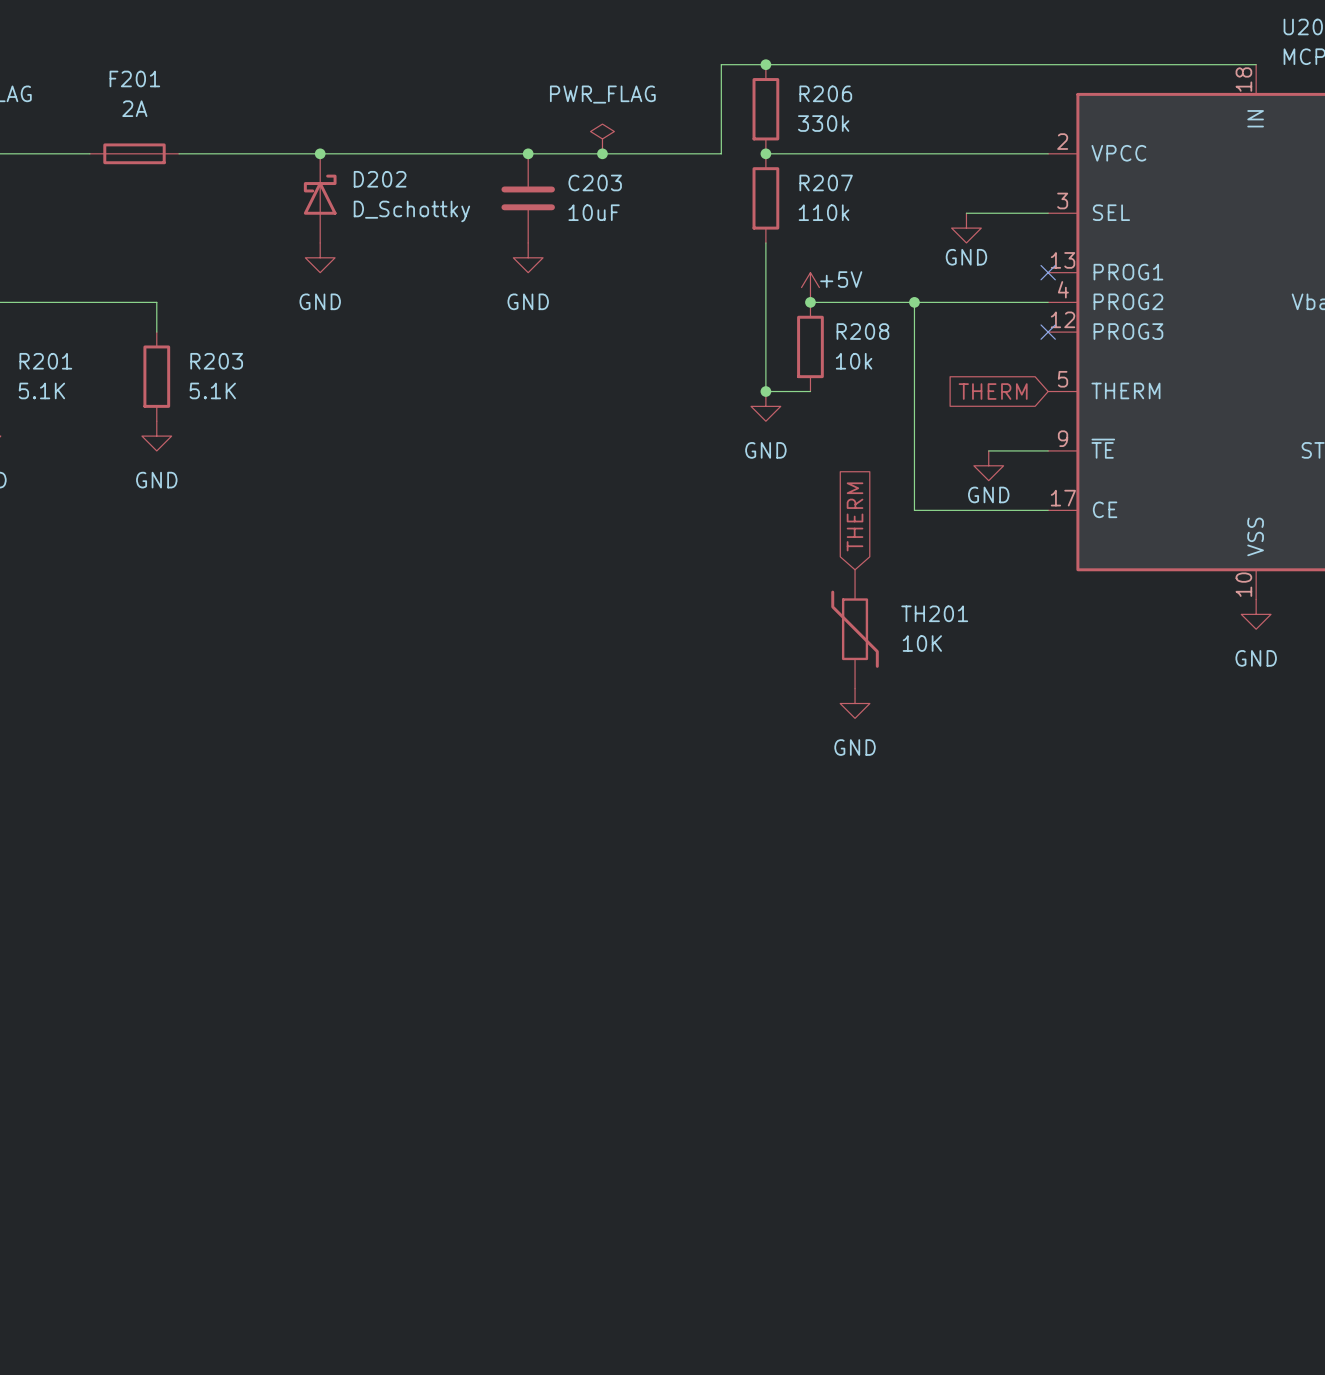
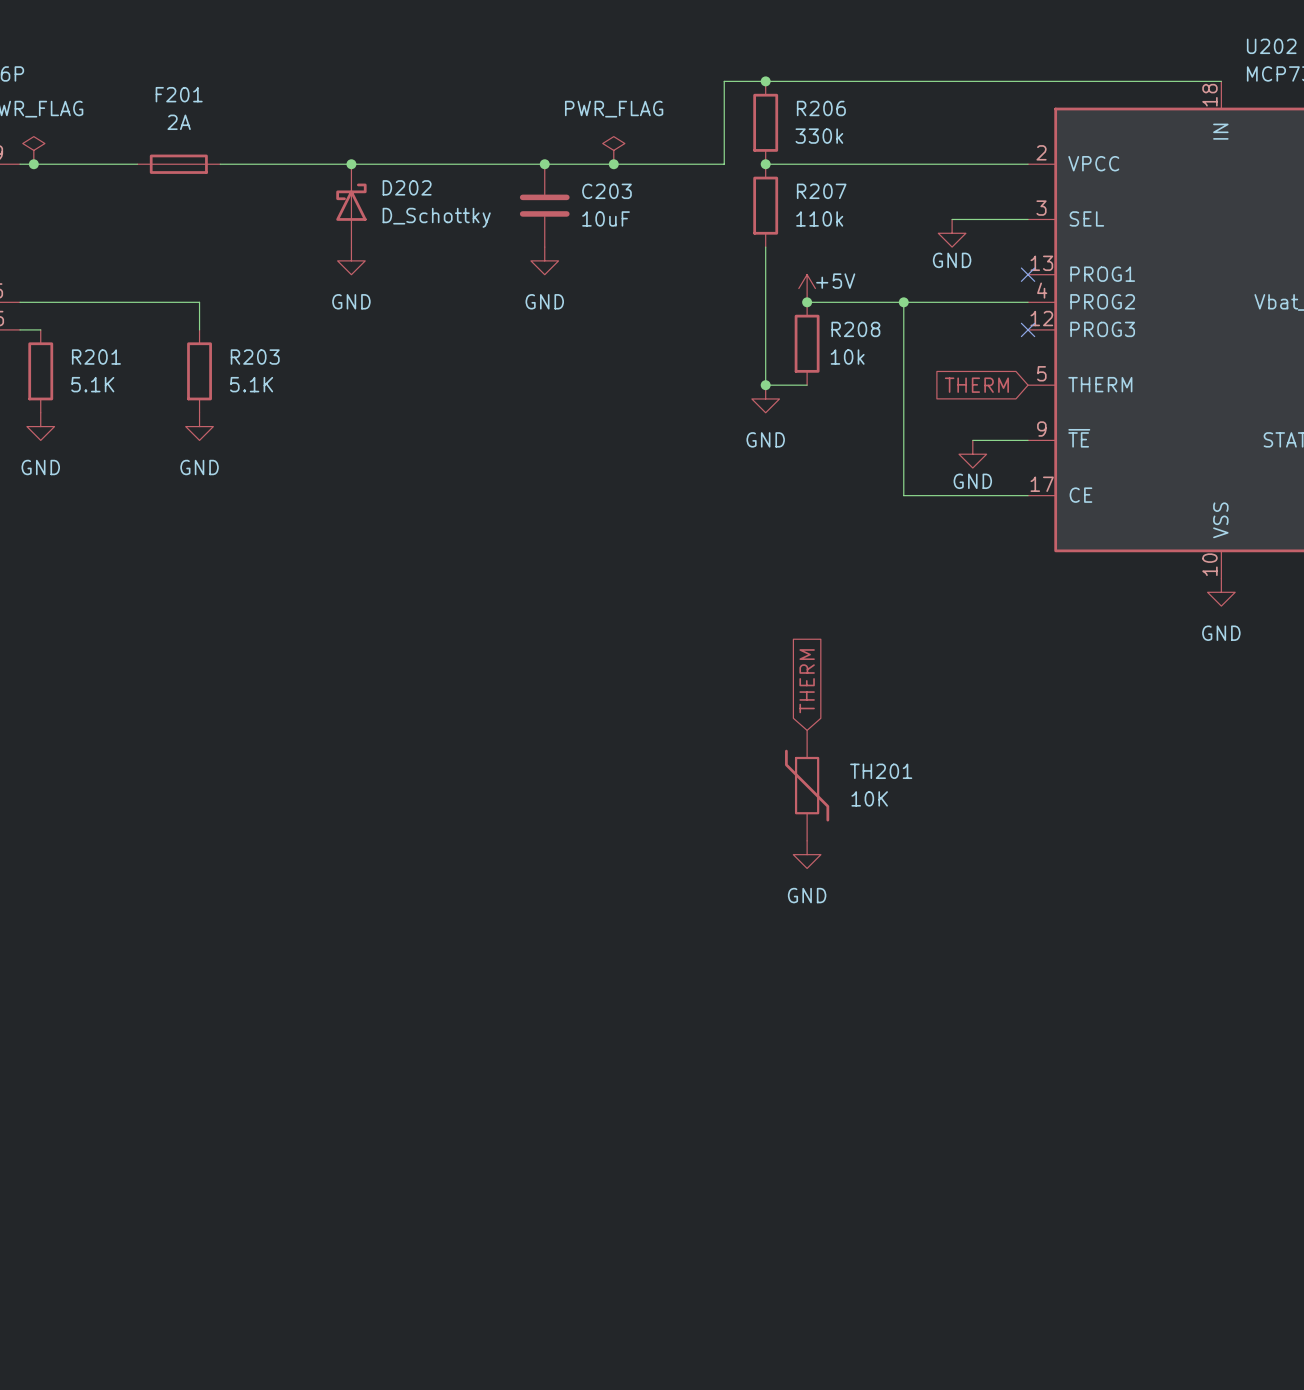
global label position: THERM (855, 516) -> THERM (807, 681)
TH201 position: (855, 629) -> (807, 785)
power symbol position: GND (855, 703) -> GND (807, 854)

